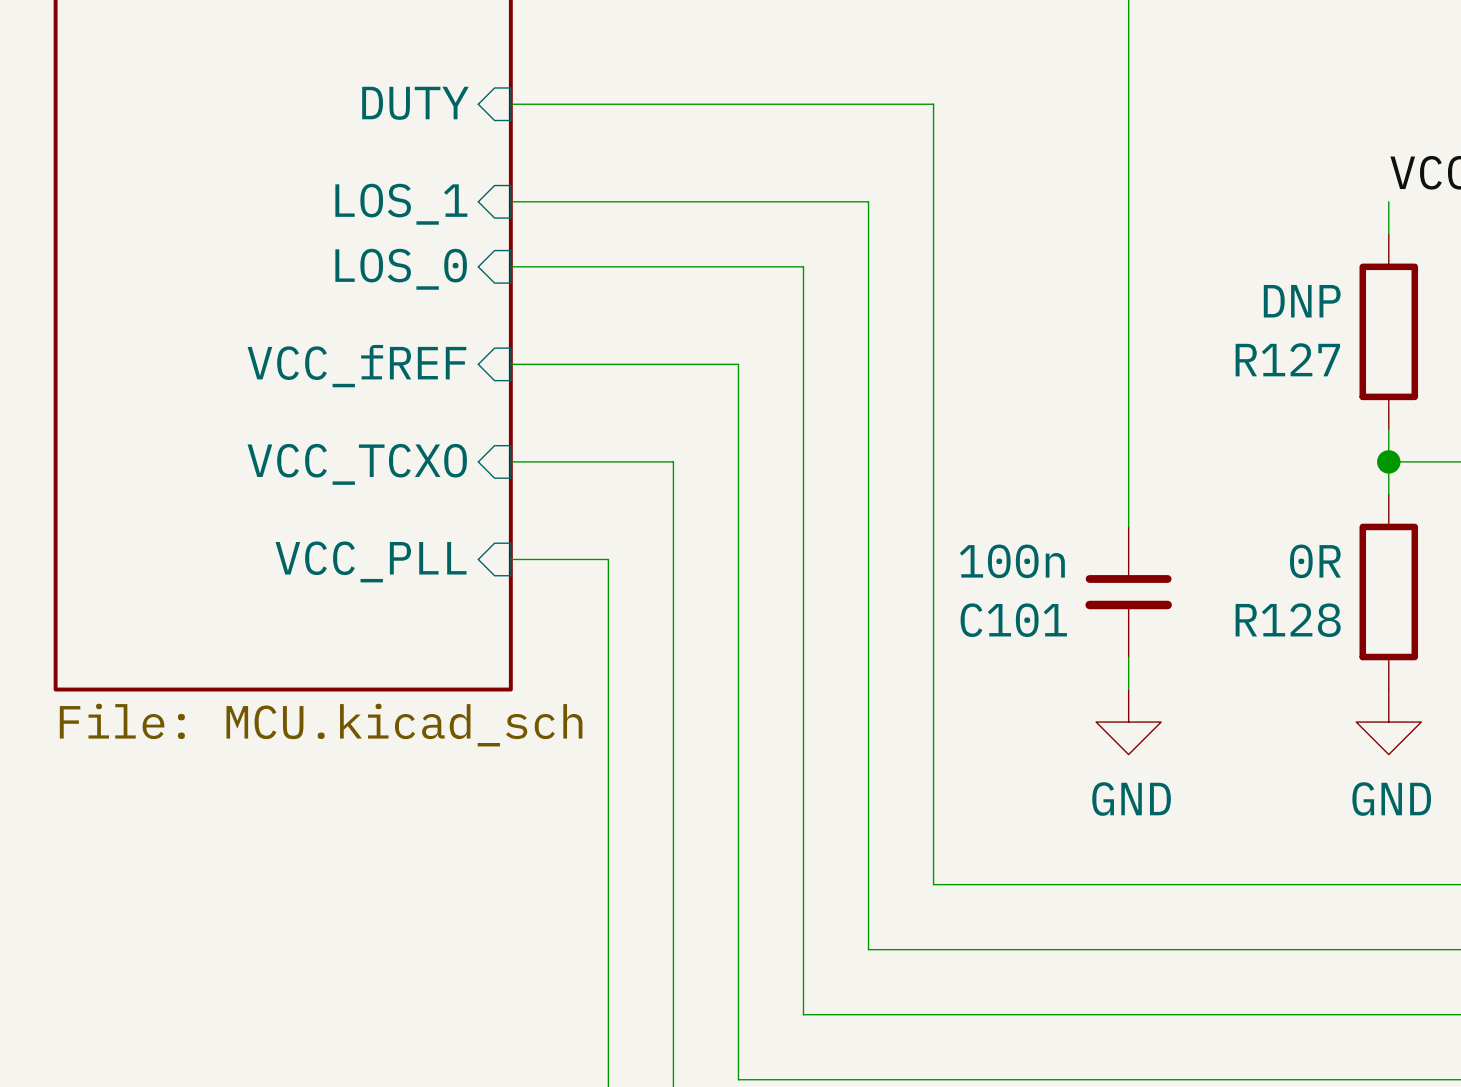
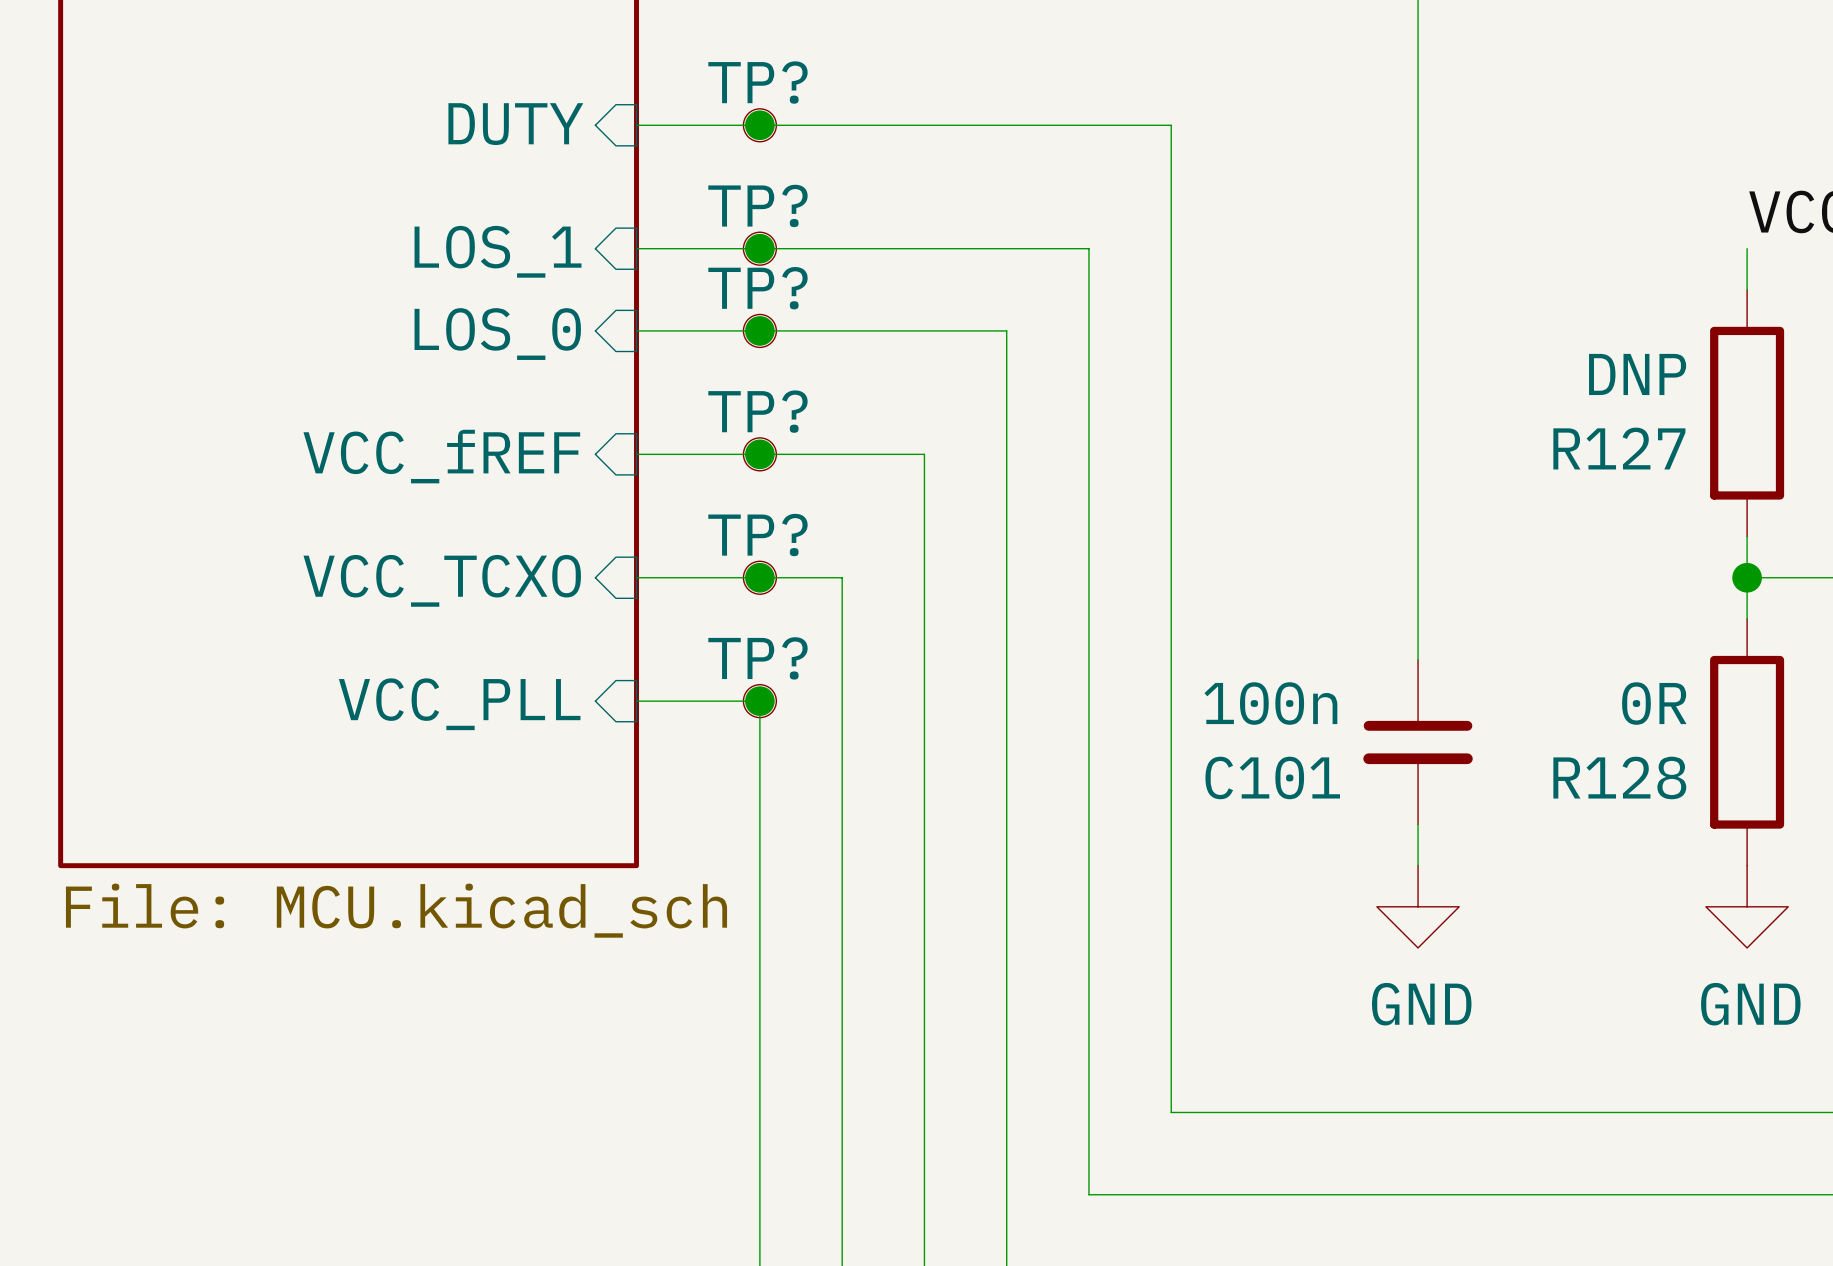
junction: none -> (759, 125)
TP?: none -> (759, 125)
junction: none -> (759, 248)
TP?: none -> (759, 248)
junction: none -> (759, 330)
TP?: none -> (759, 330)
junction: none -> (759, 454)
TP?: none -> (759, 454)
junction: none -> (759, 577)
TP?: none -> (759, 577)
junction: none -> (759, 701)
TP?: none -> (759, 701)

